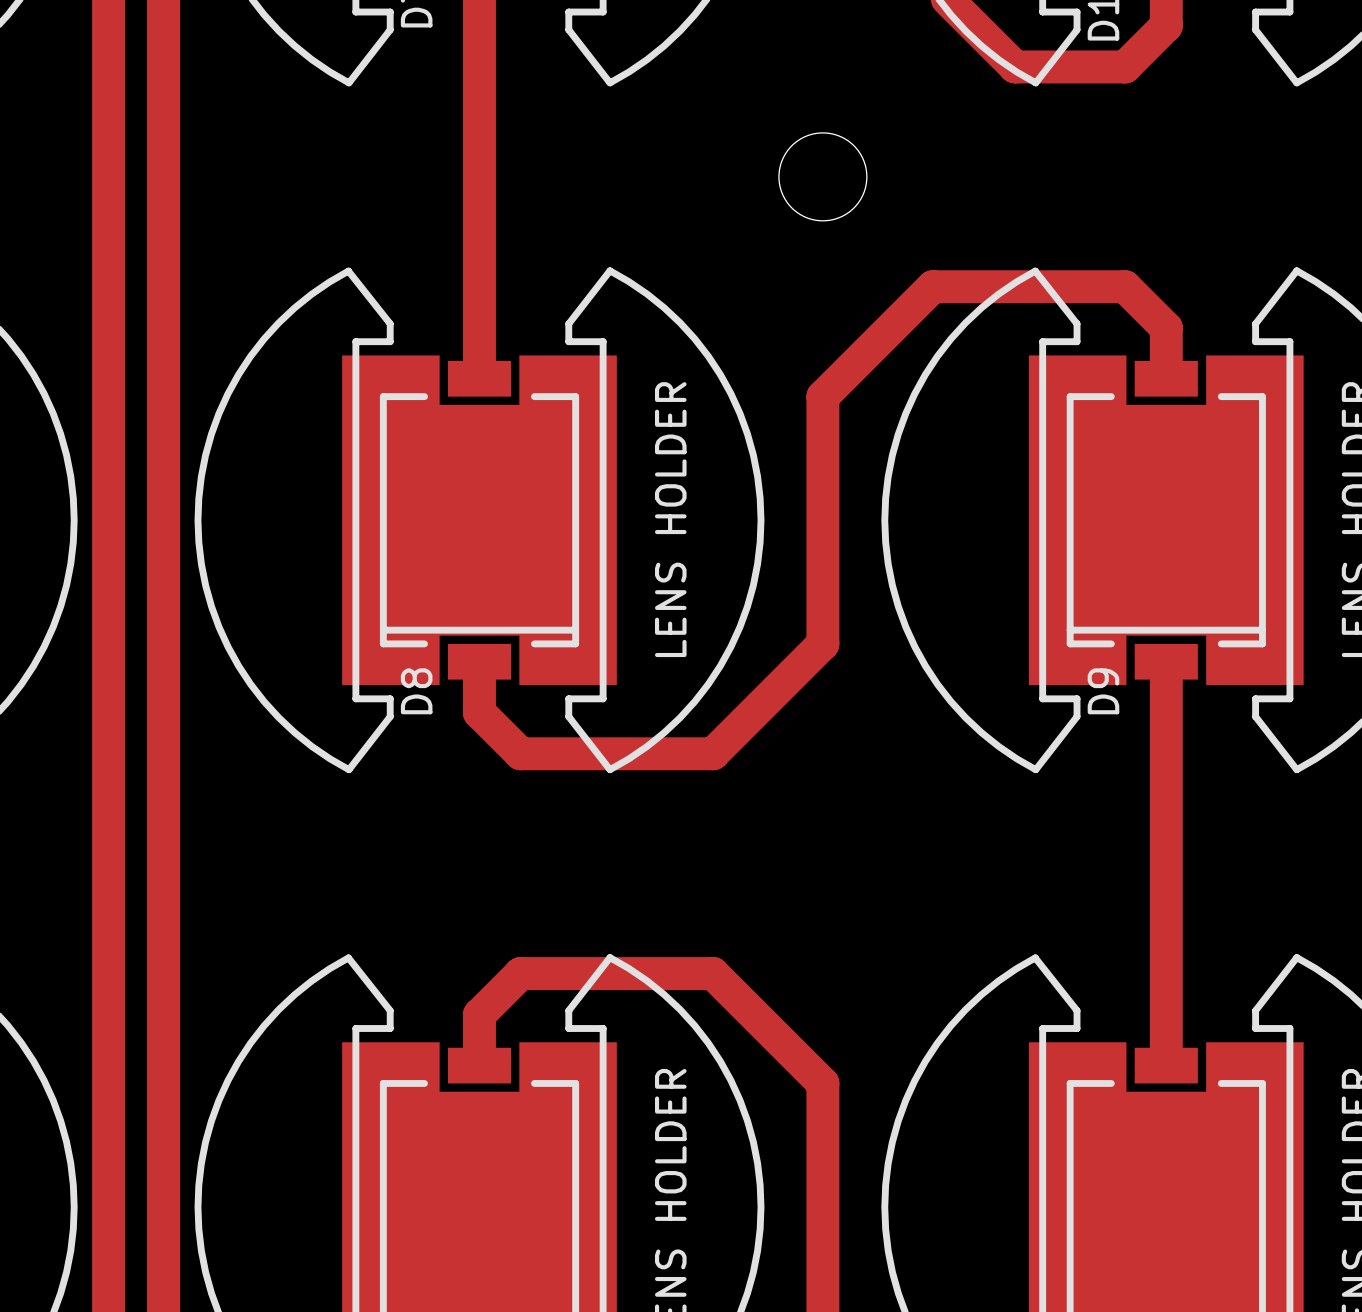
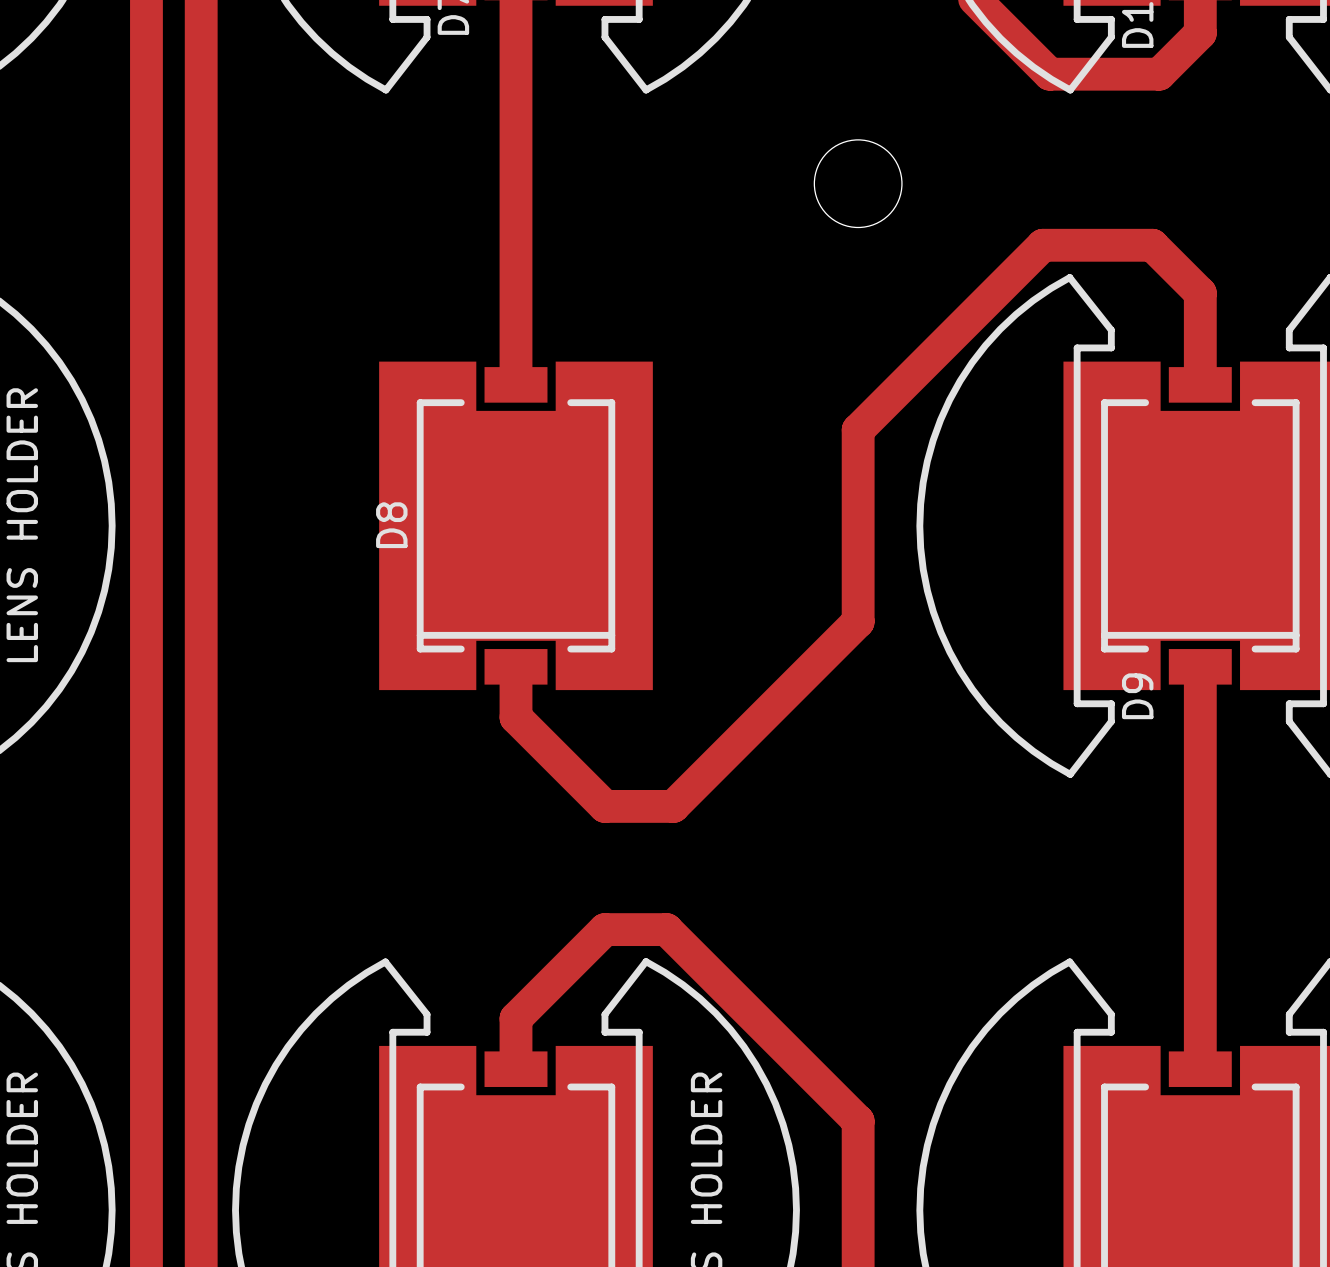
drawing: [194, 267, 765, 774] -> none
top track: (1166, 327) (1125, 286) (932, 286) (822, 396) (822, 424) -> (1200, 334) (1200, 293) (1152, 245) (1042, 245) (858, 430)
top track: (822, 616) (822, 643) (713, 753) (520, 753) -> (858, 621) (673, 806) (604, 806) (557, 758)
D8 name position: D8 (416, 691) -> D8 (391, 525)
top track: (520, 973) (713, 973) (822, 1083) (822, 1117) -> (557, 977) (604, 929) (666, 929) (858, 1121)

